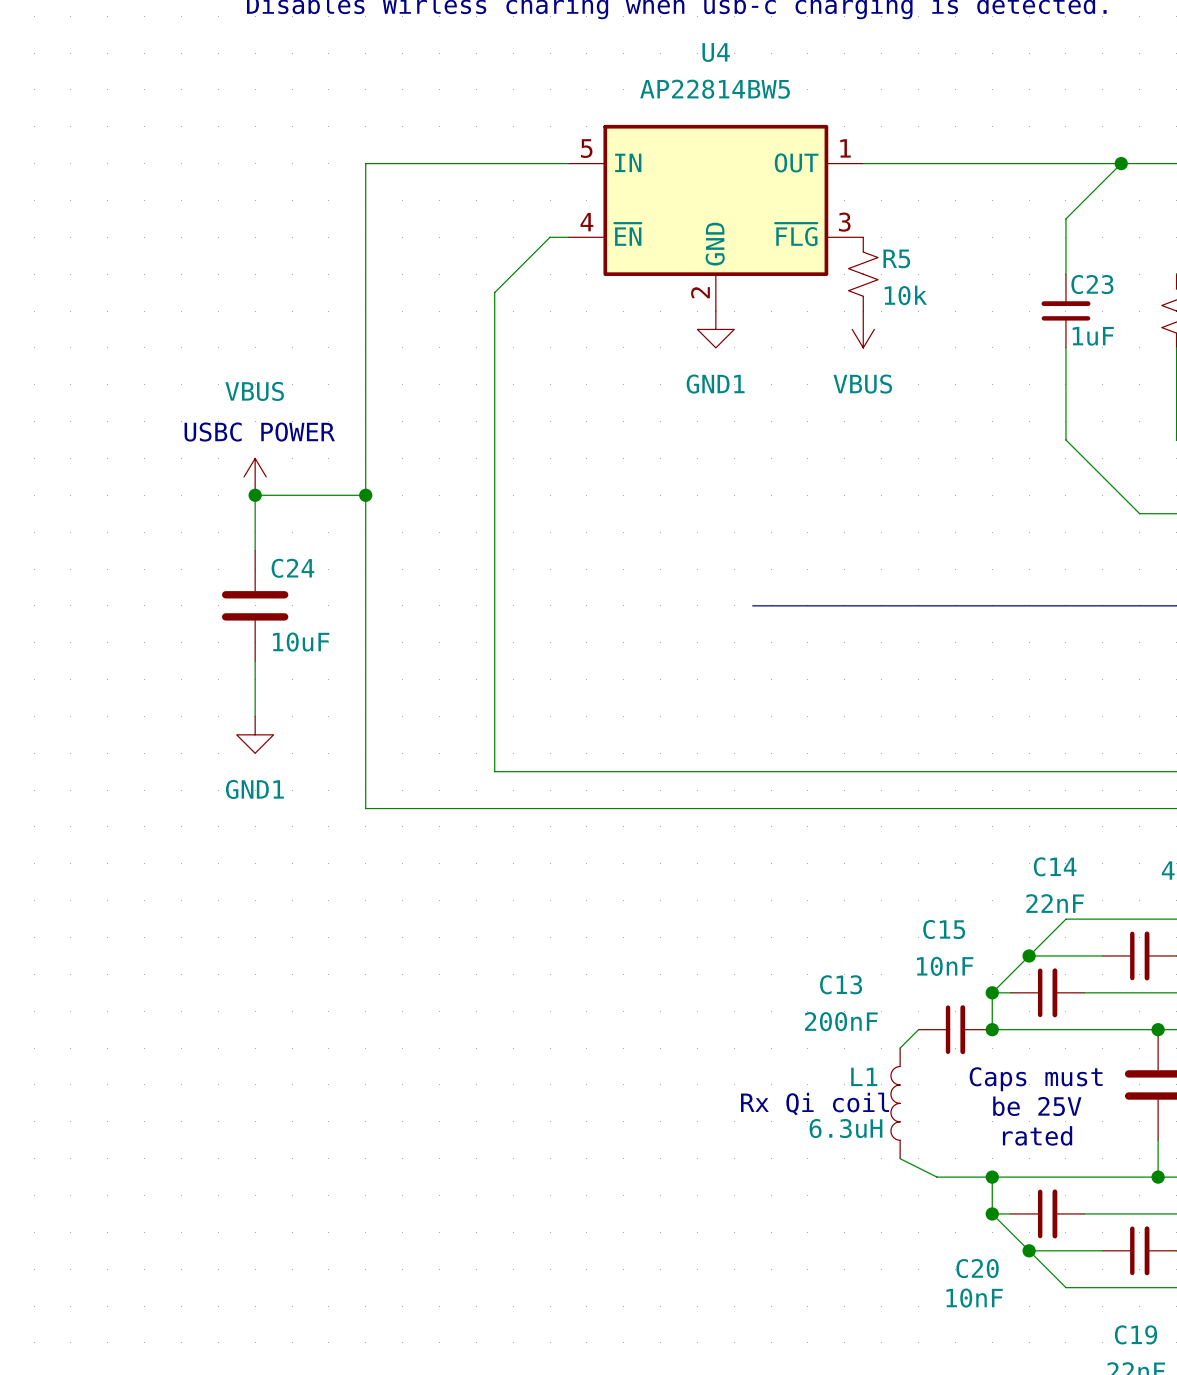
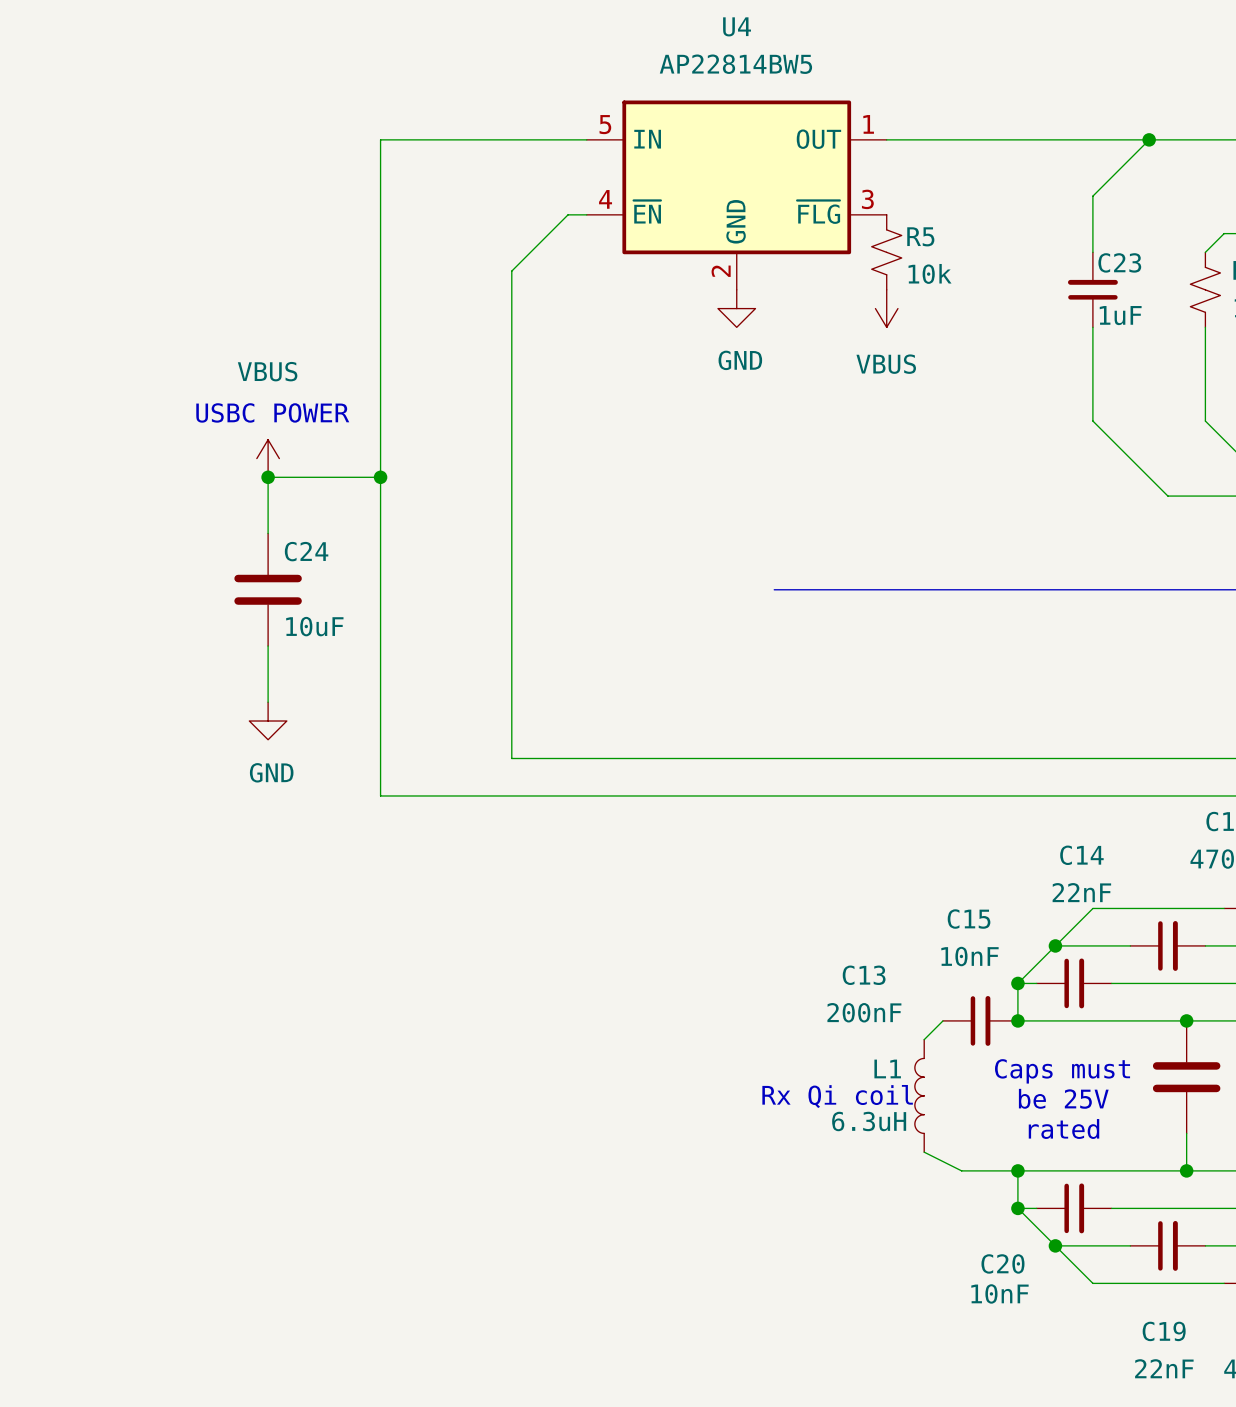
power symbol: GND1 (715, 329) -> GND (736, 308)
power symbol: GND1 (255, 734) -> GND (268, 721)

